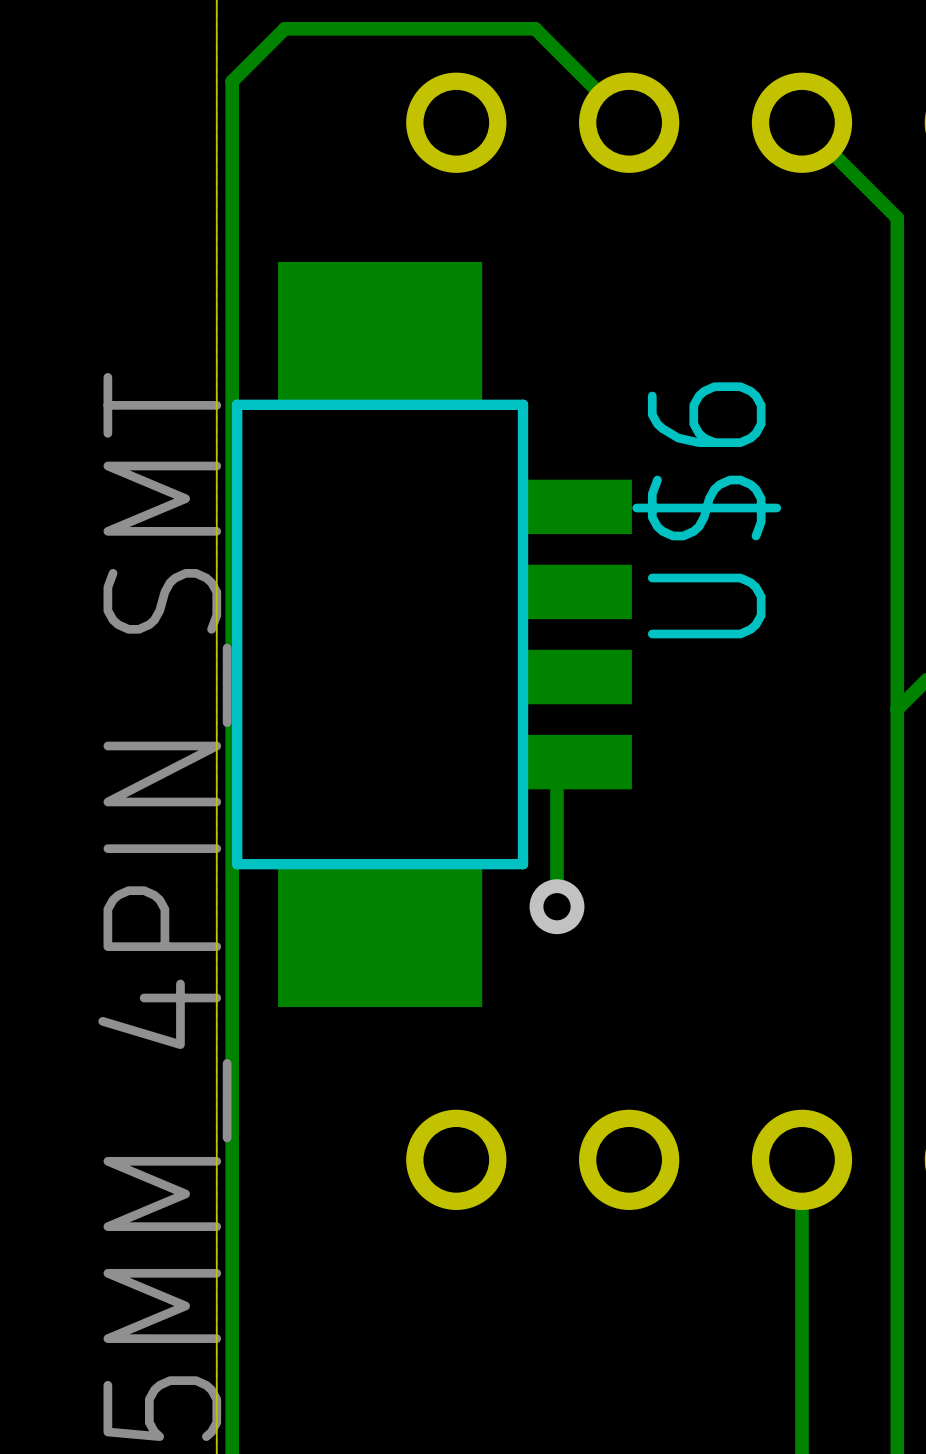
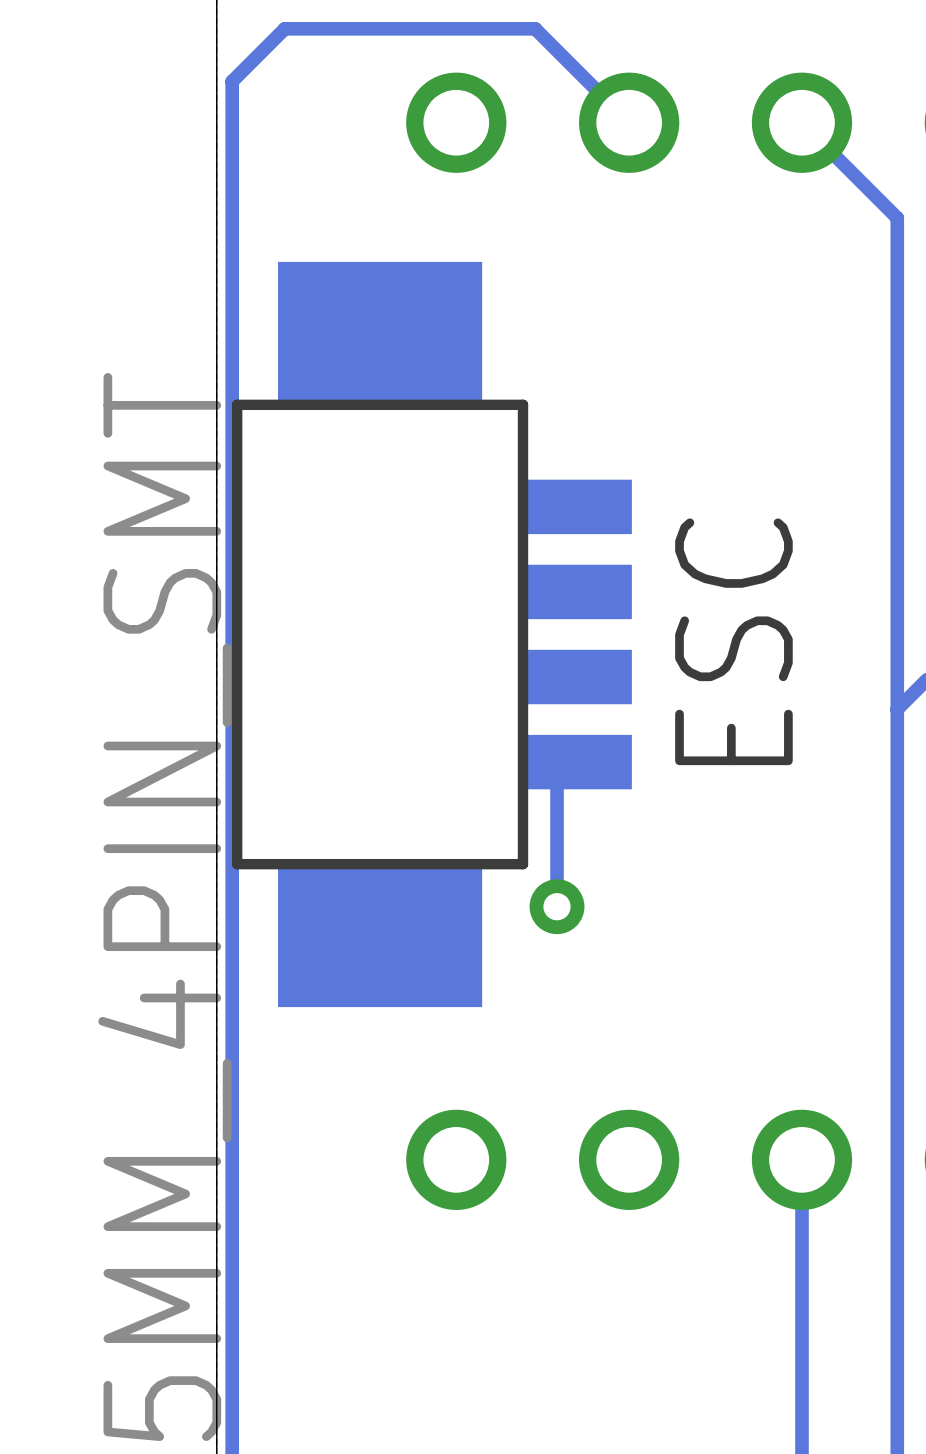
U$6 name: U$6 (706, 510) -> ESC (733, 641)

